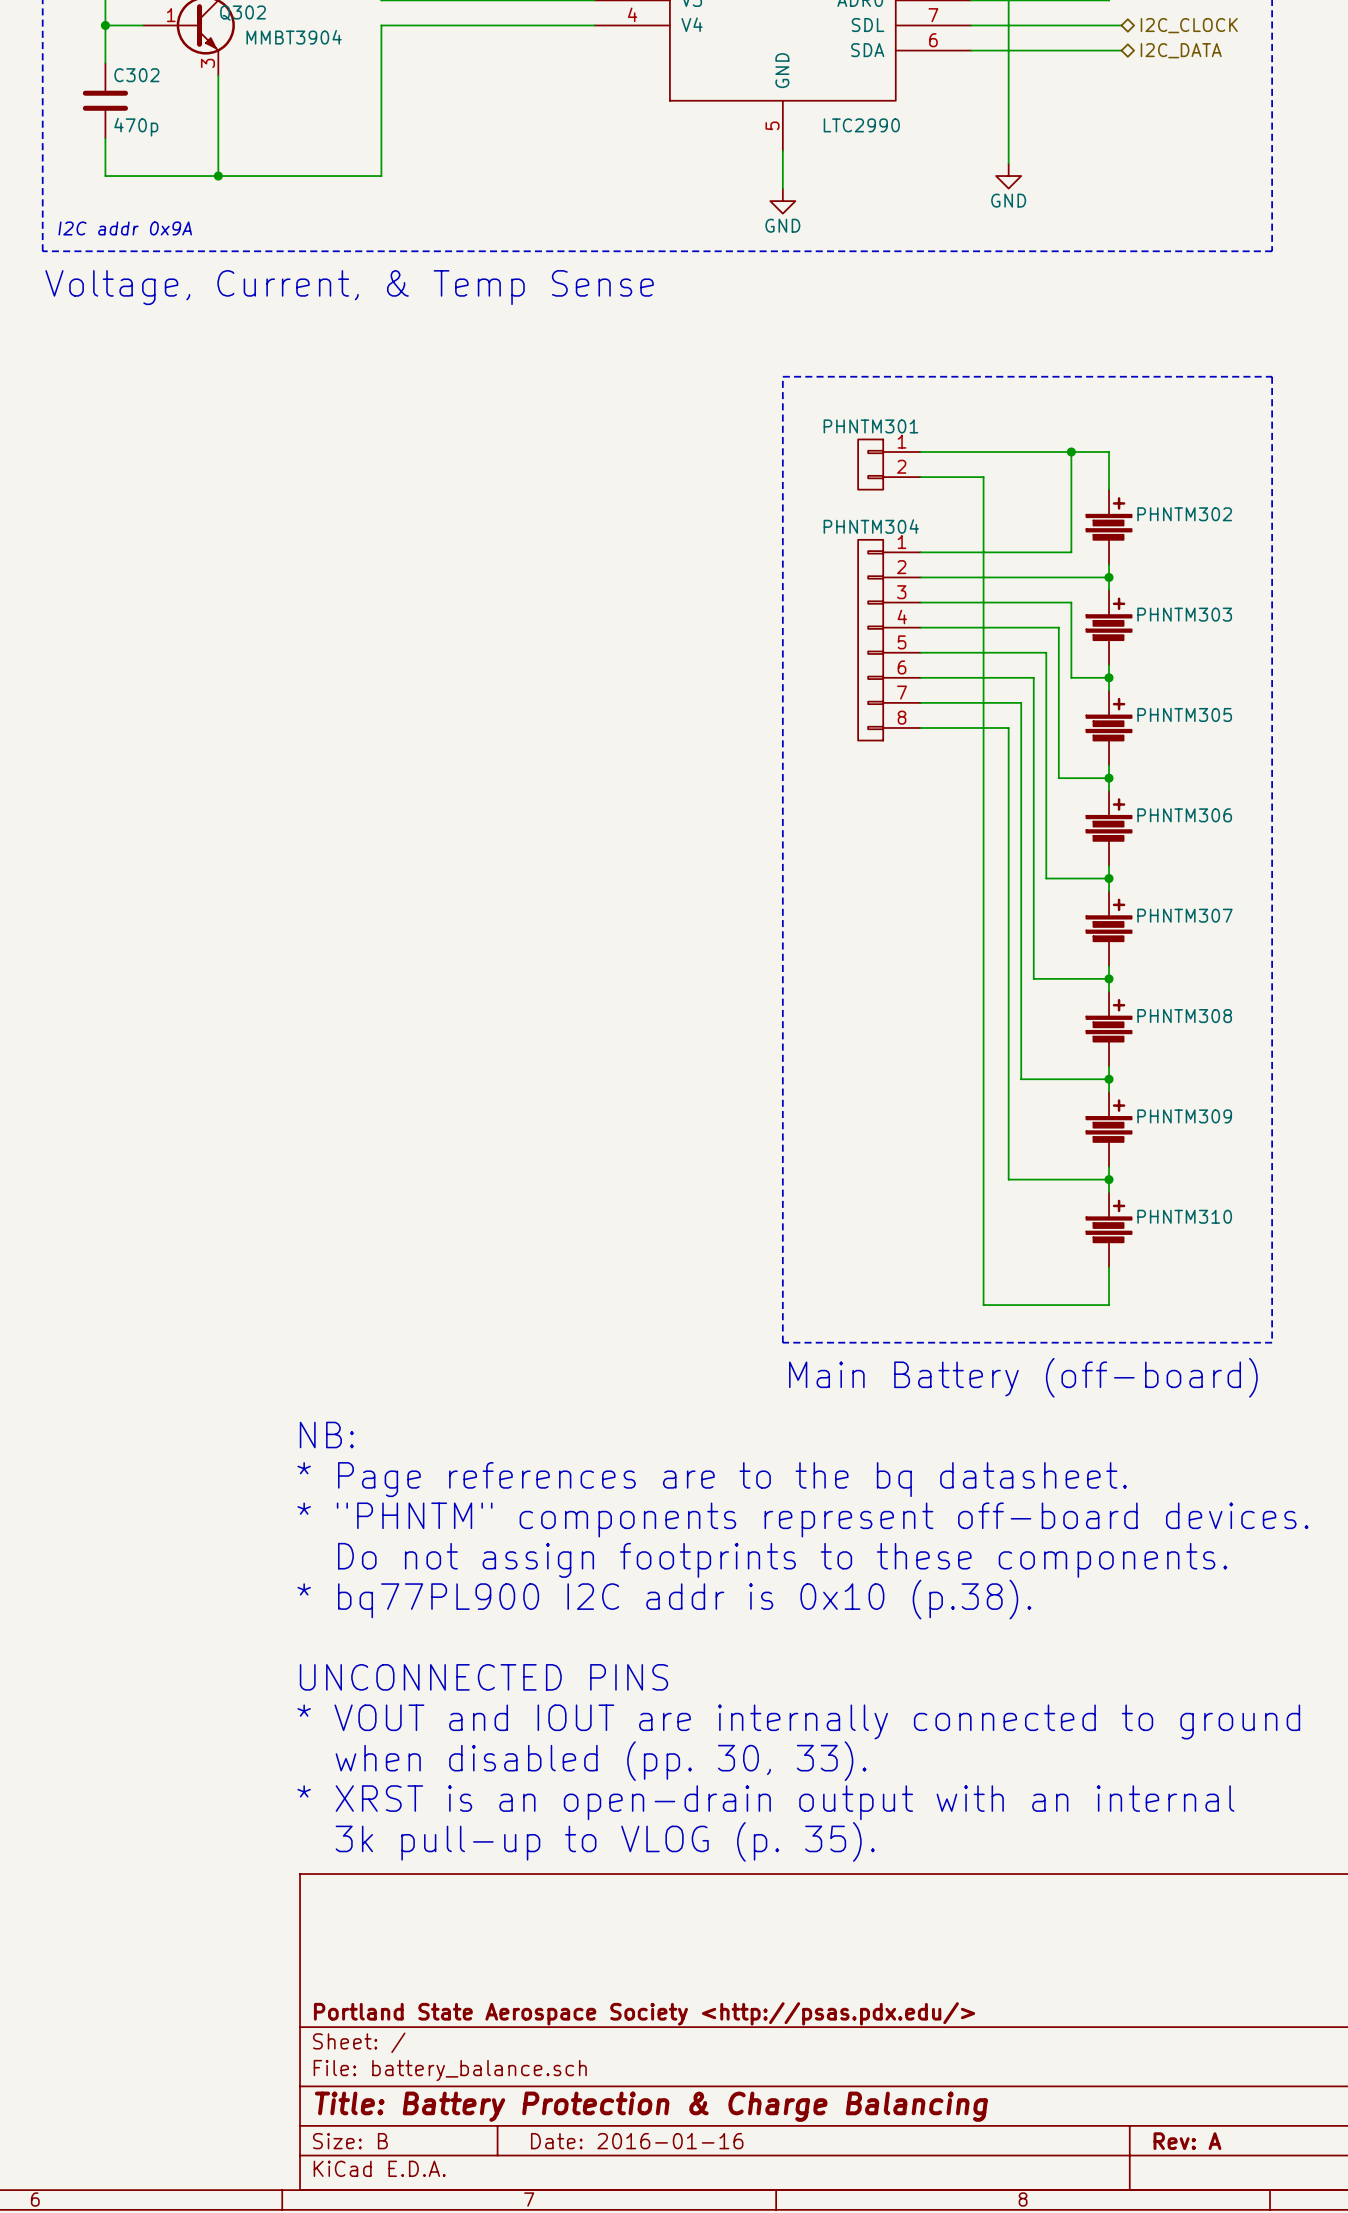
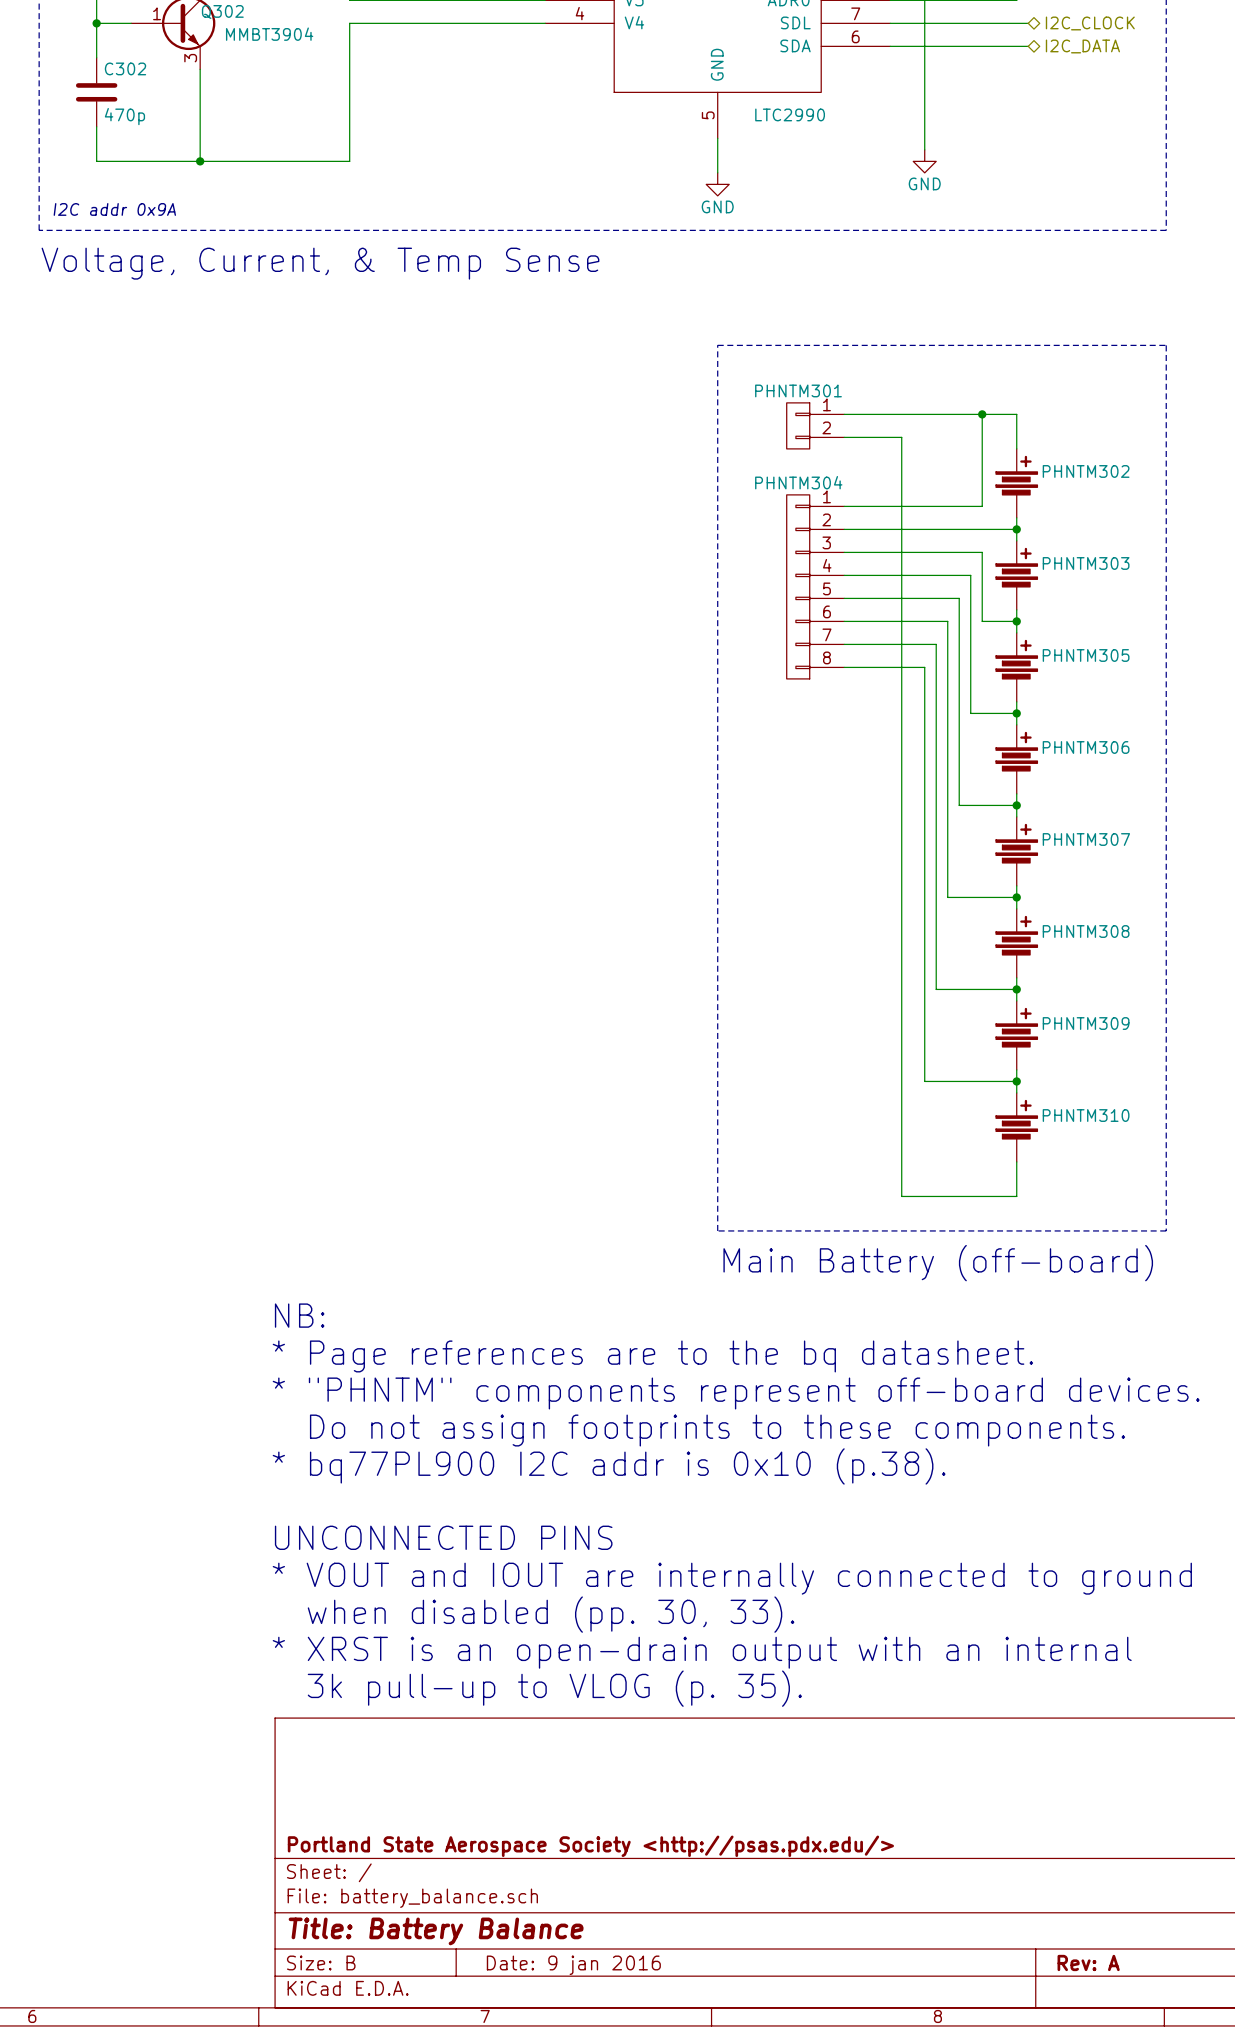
title block: Title: Battery Protection & Charge Balancing (651, 2106) -> Title: Battery Balance (436, 1931)
title block: Date: 2016-01-16 (637, 2141) -> Date: 9 jan 2016 (573, 1965)

